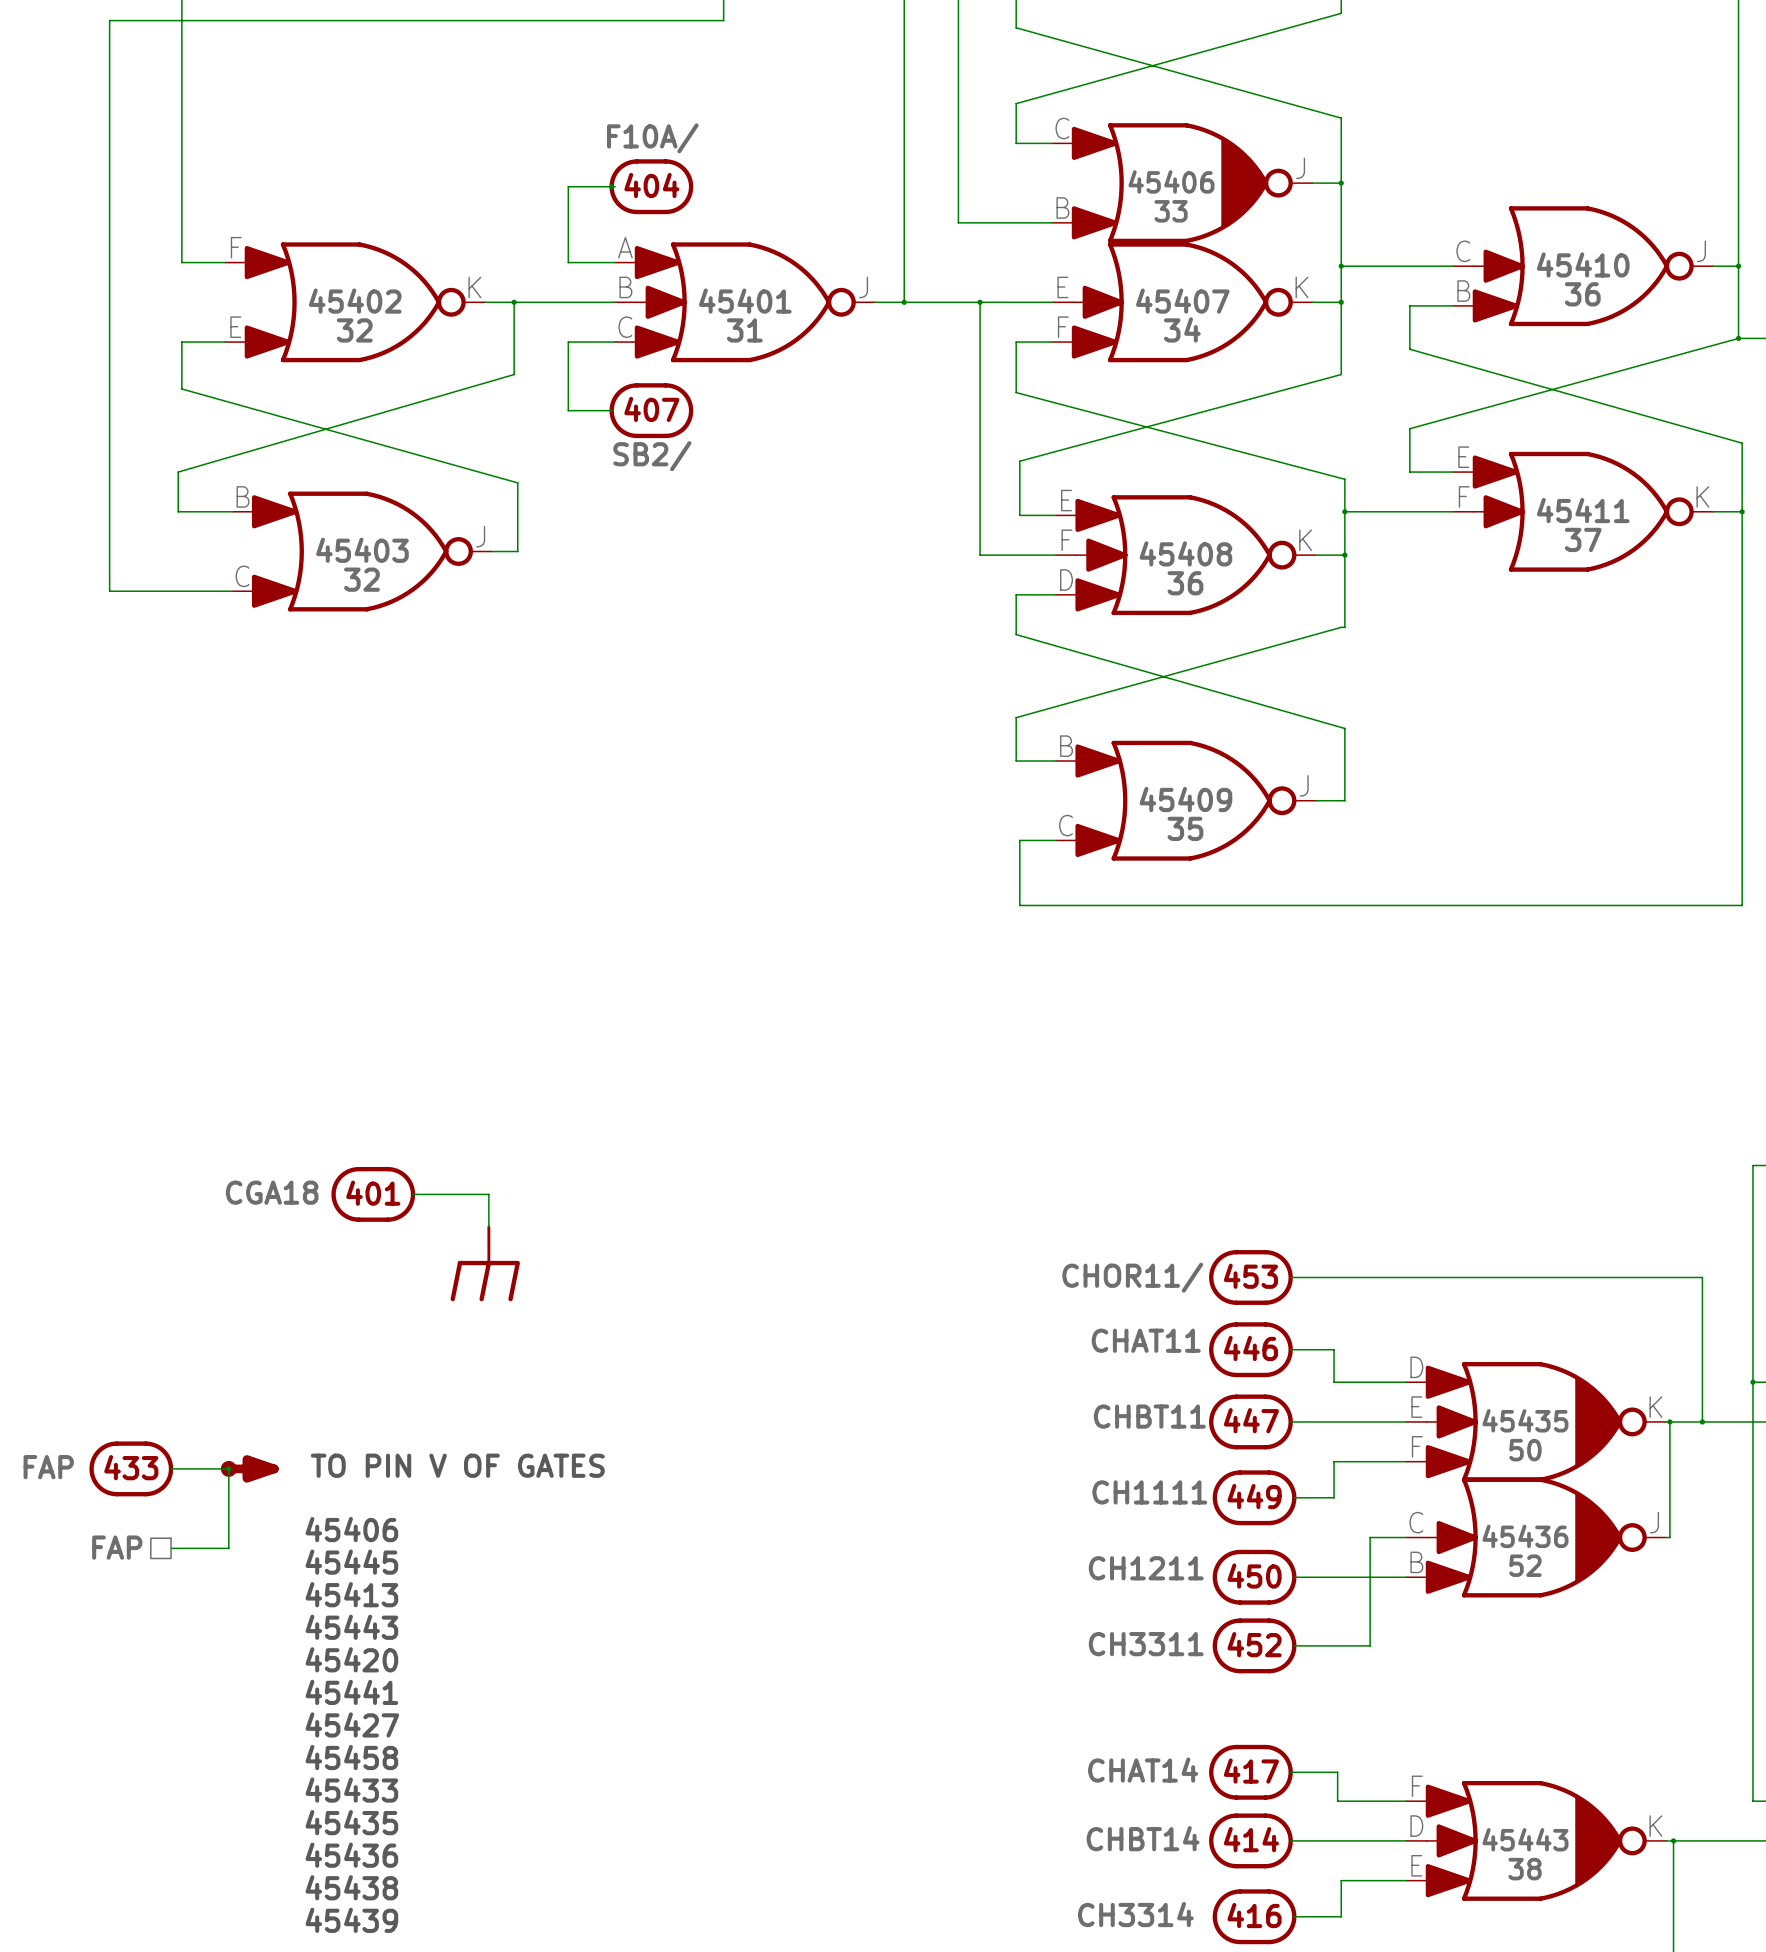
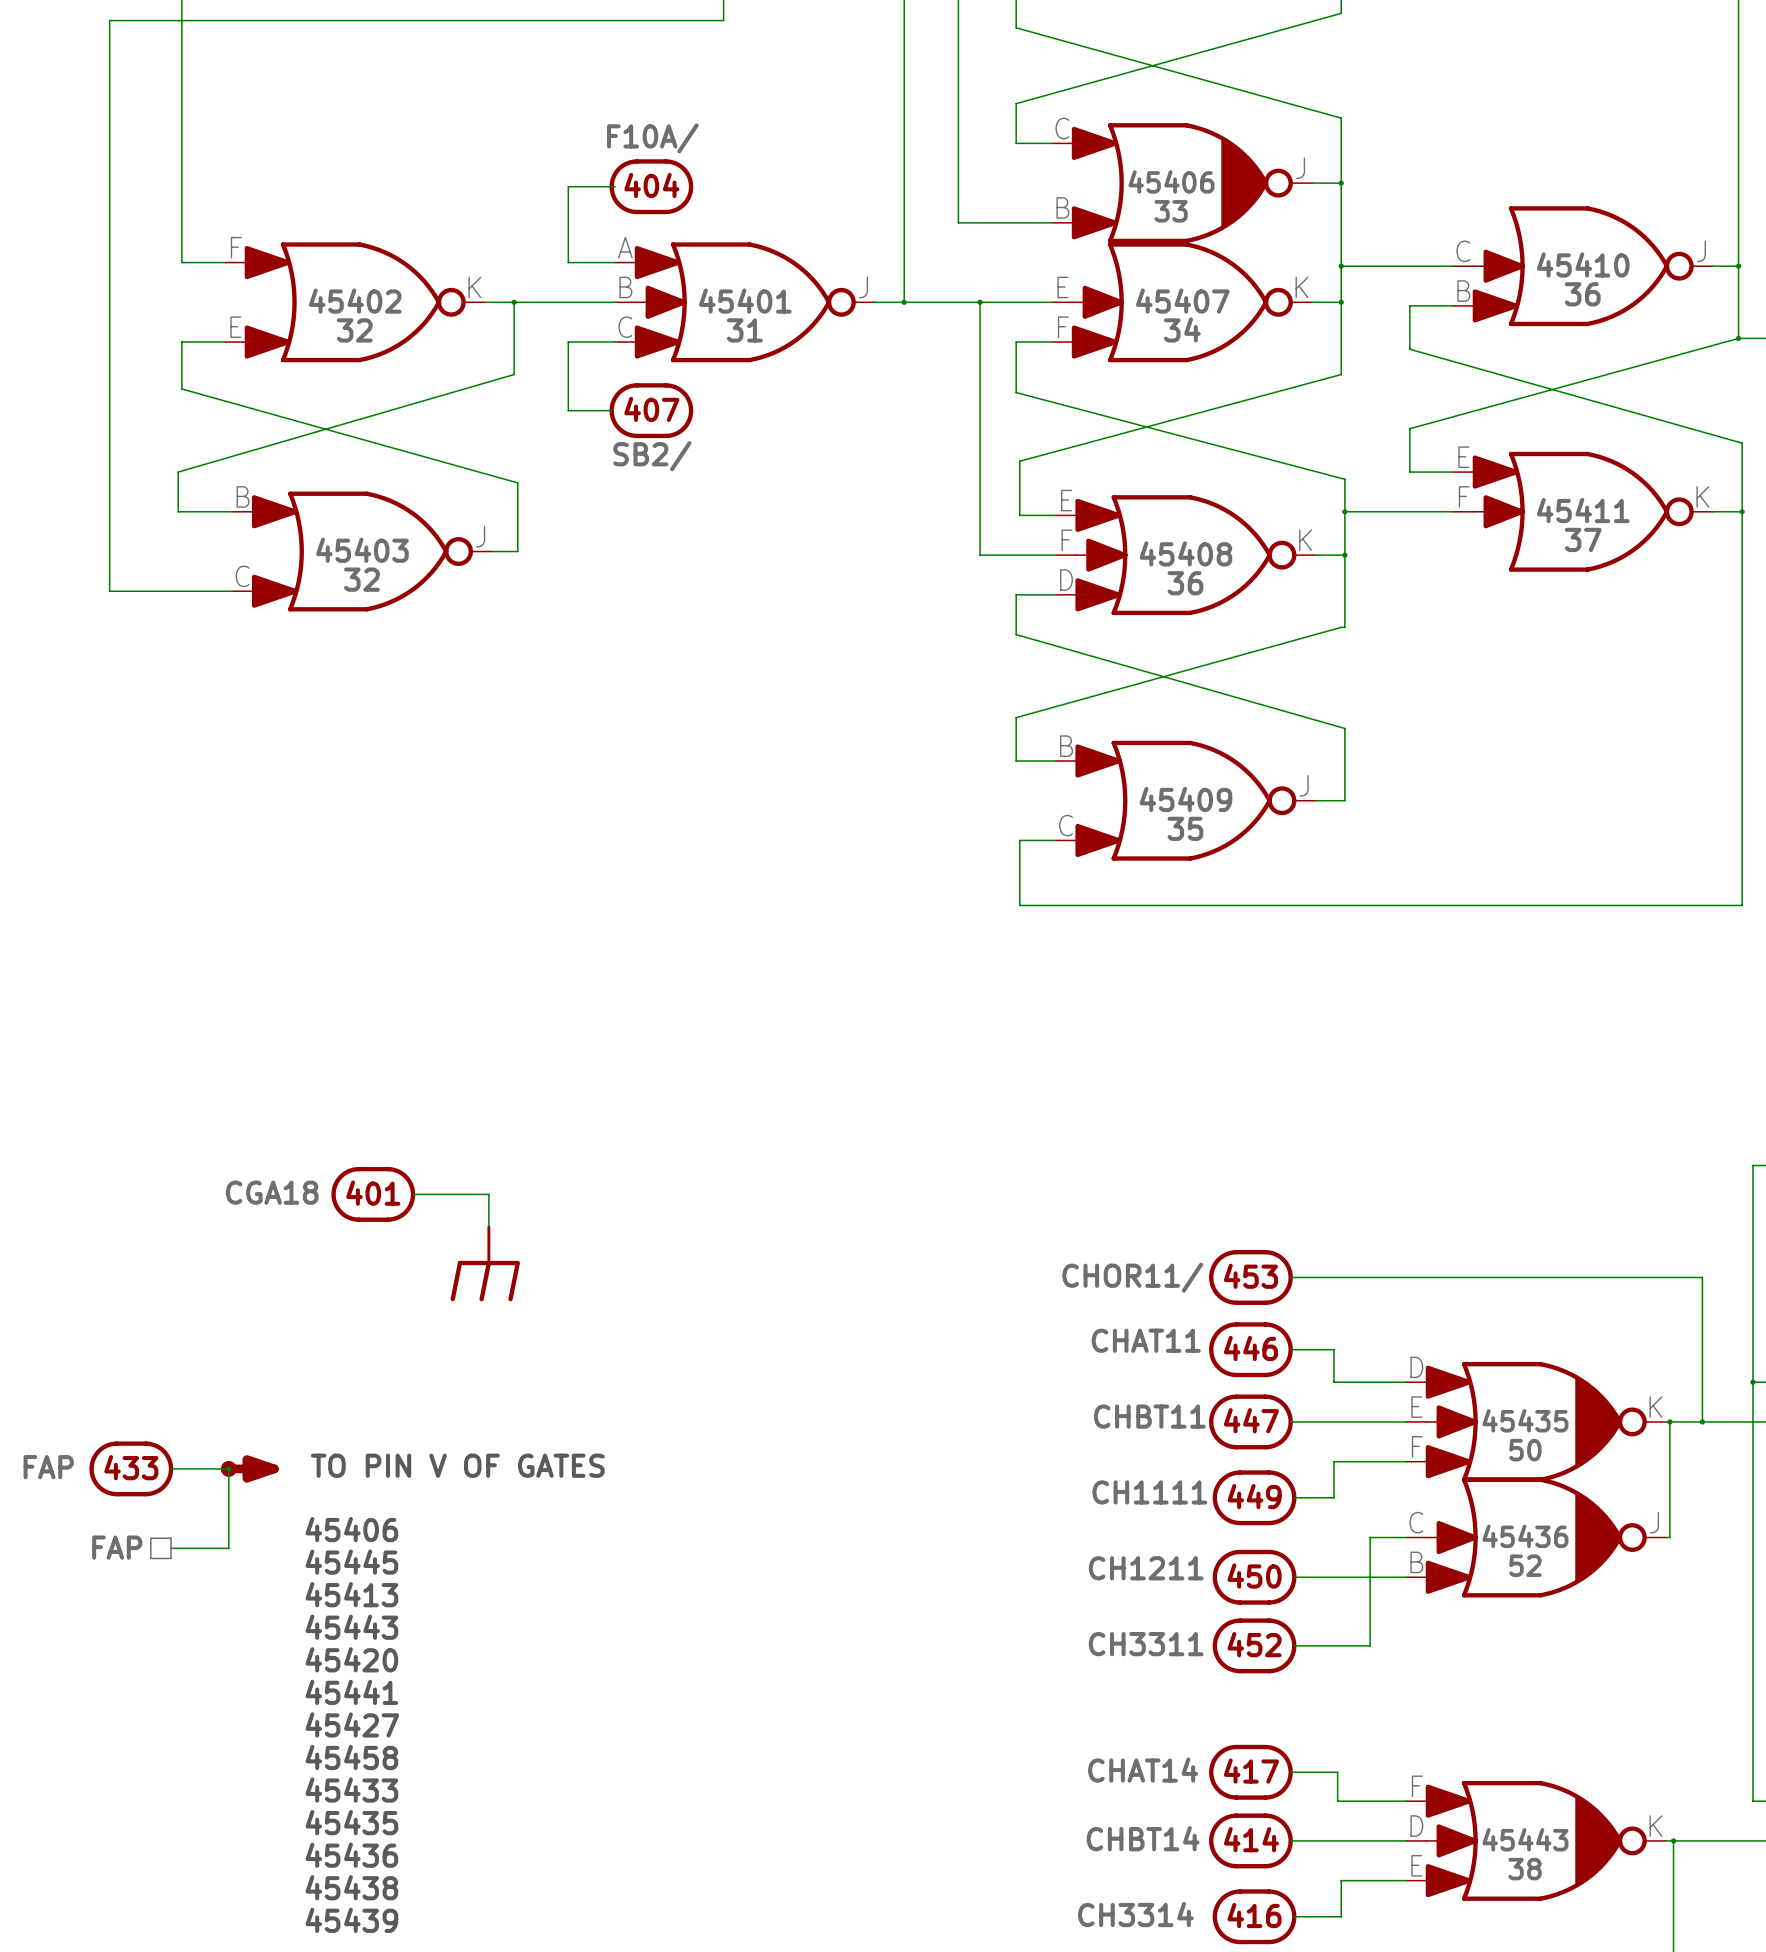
junction: (611, 186) -> none

